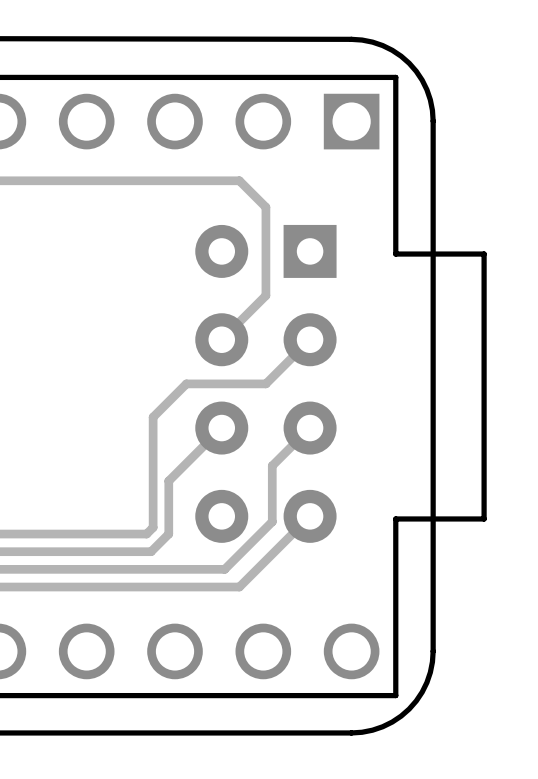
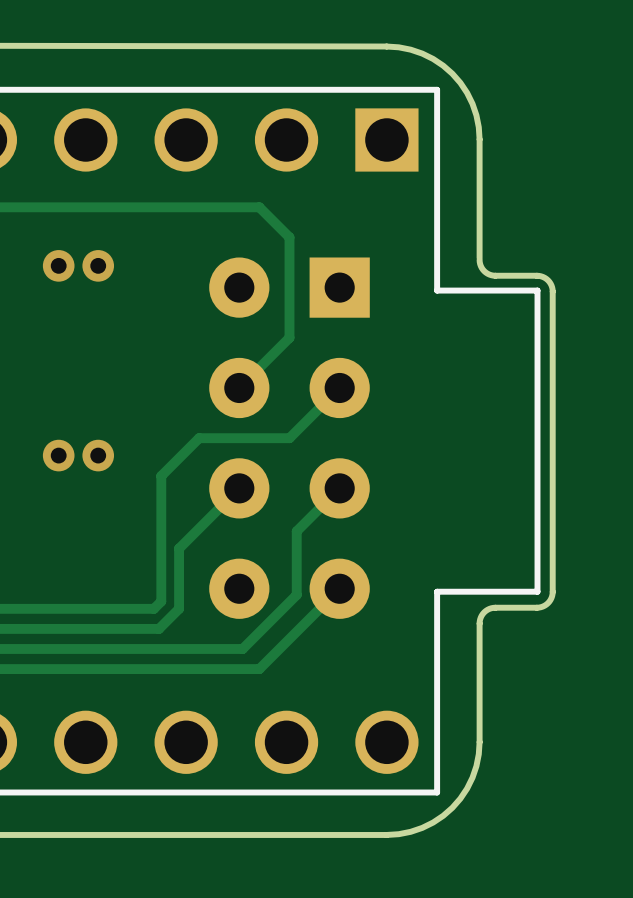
board edge: (433, 225) (433, 546) -> (479, 259) (482, 269) (489, 274) (541, 276) (549, 281) (552, 291) (552, 596) (548, 603) (541, 607) (489, 608) (482, 613) (479, 623)
via: none -> (58, 265)
via: none -> (98, 265)
via: none -> (58, 455)
via: none -> (98, 455)

